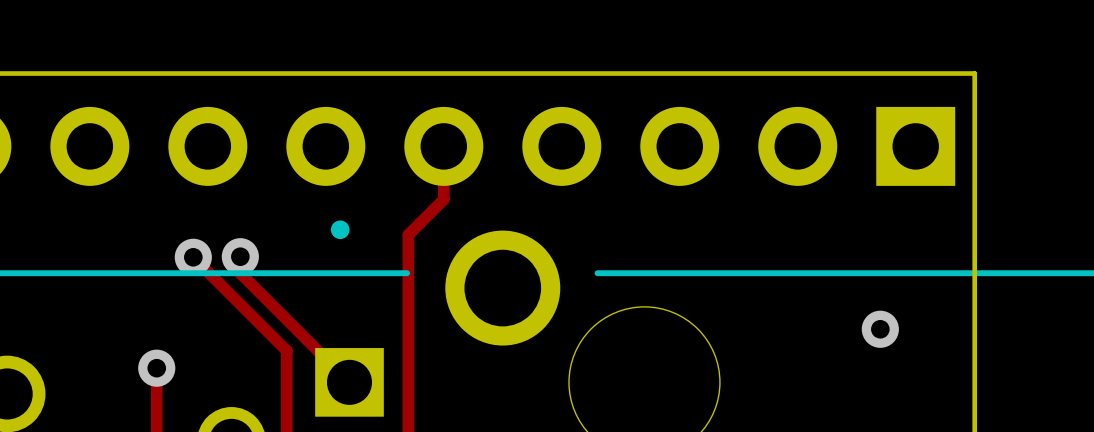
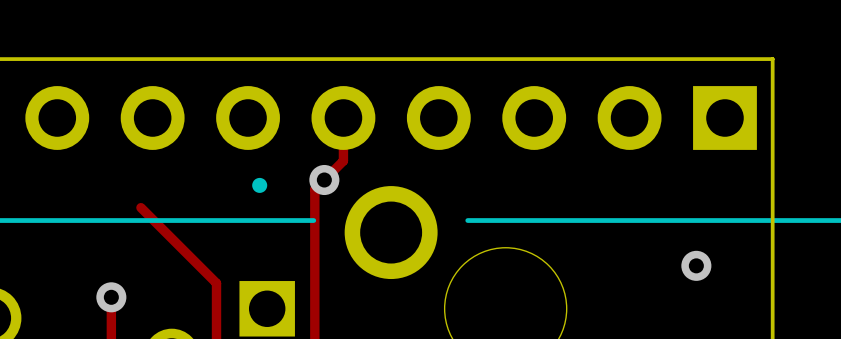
via: none -> (324, 180)
track: (240, 256) (240, 273) (349, 382) -> none
via: (240, 256) -> none
via: (193, 257) -> none

